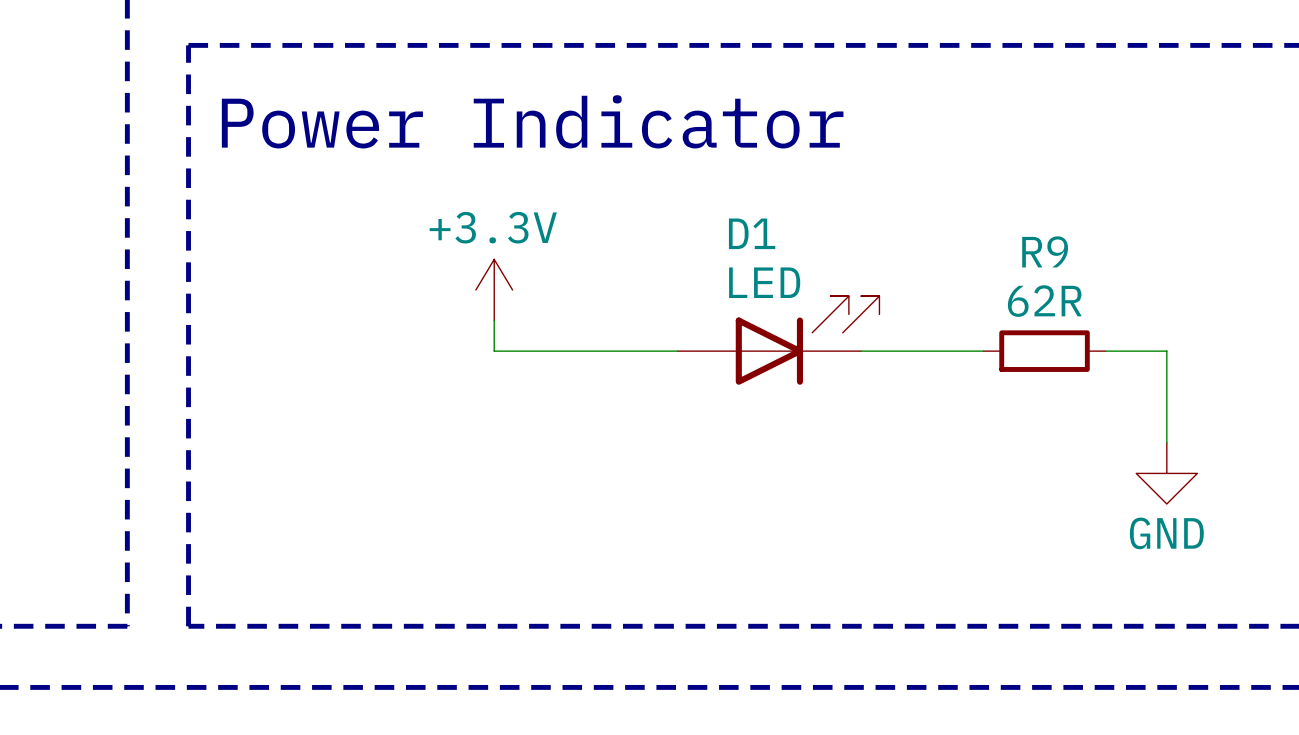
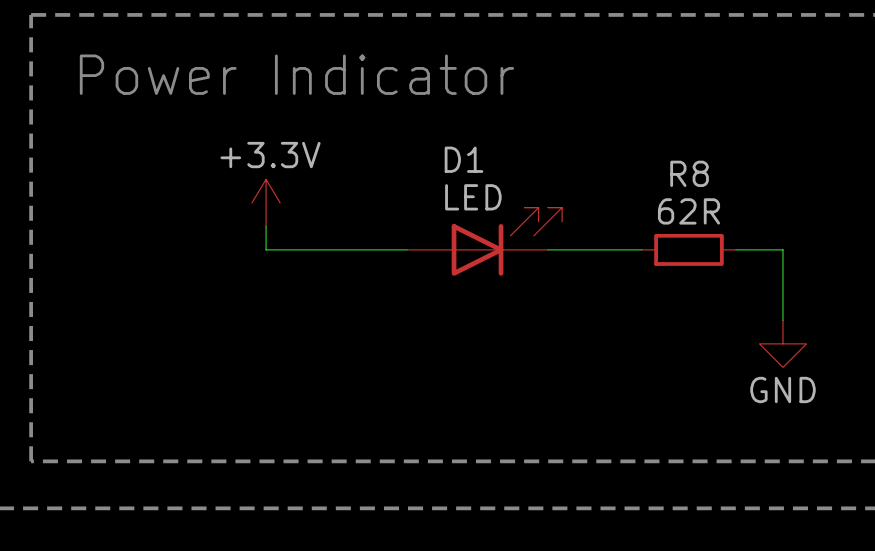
R9 name: R9 (1045, 251) -> R8 (689, 173)

